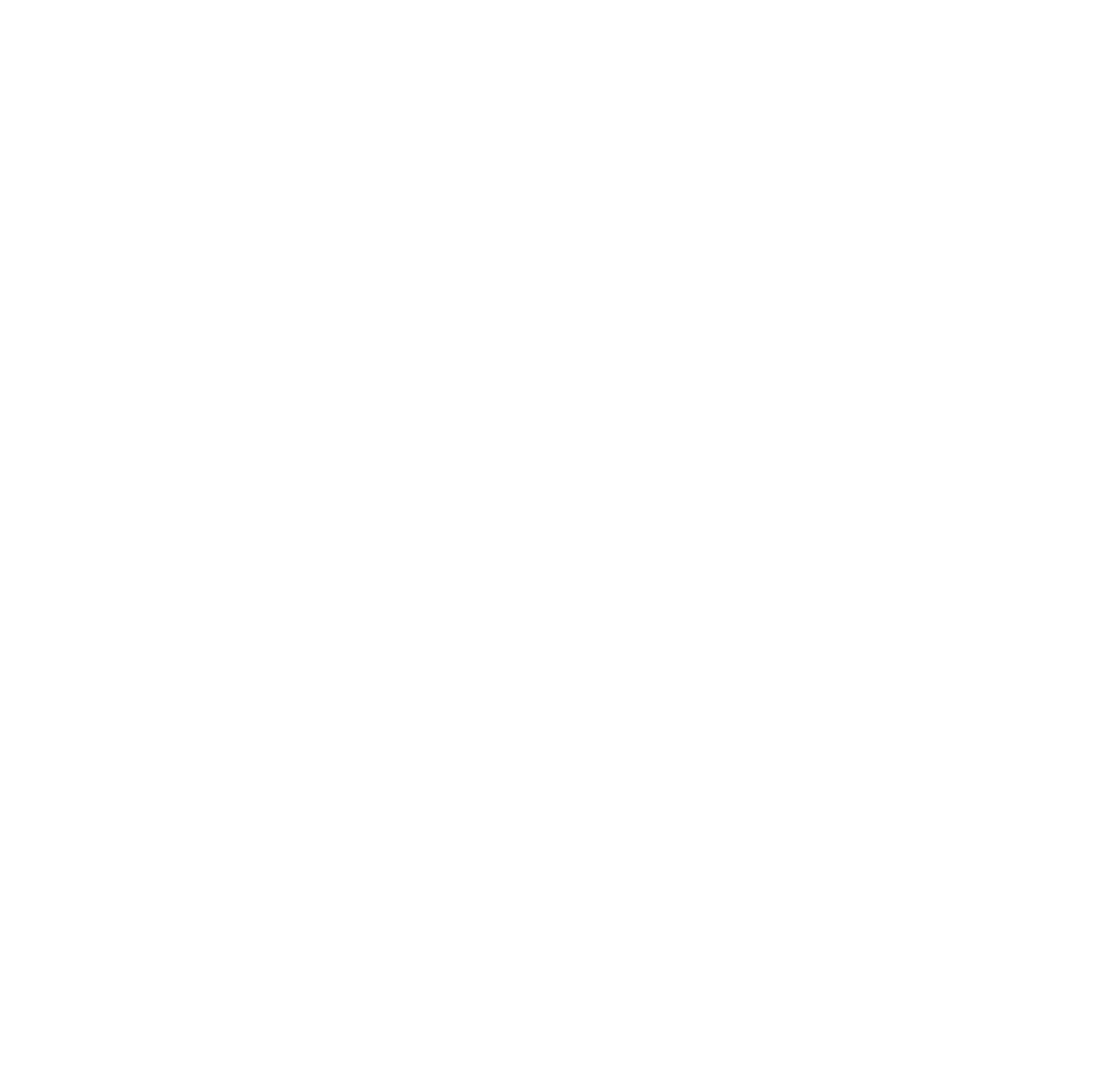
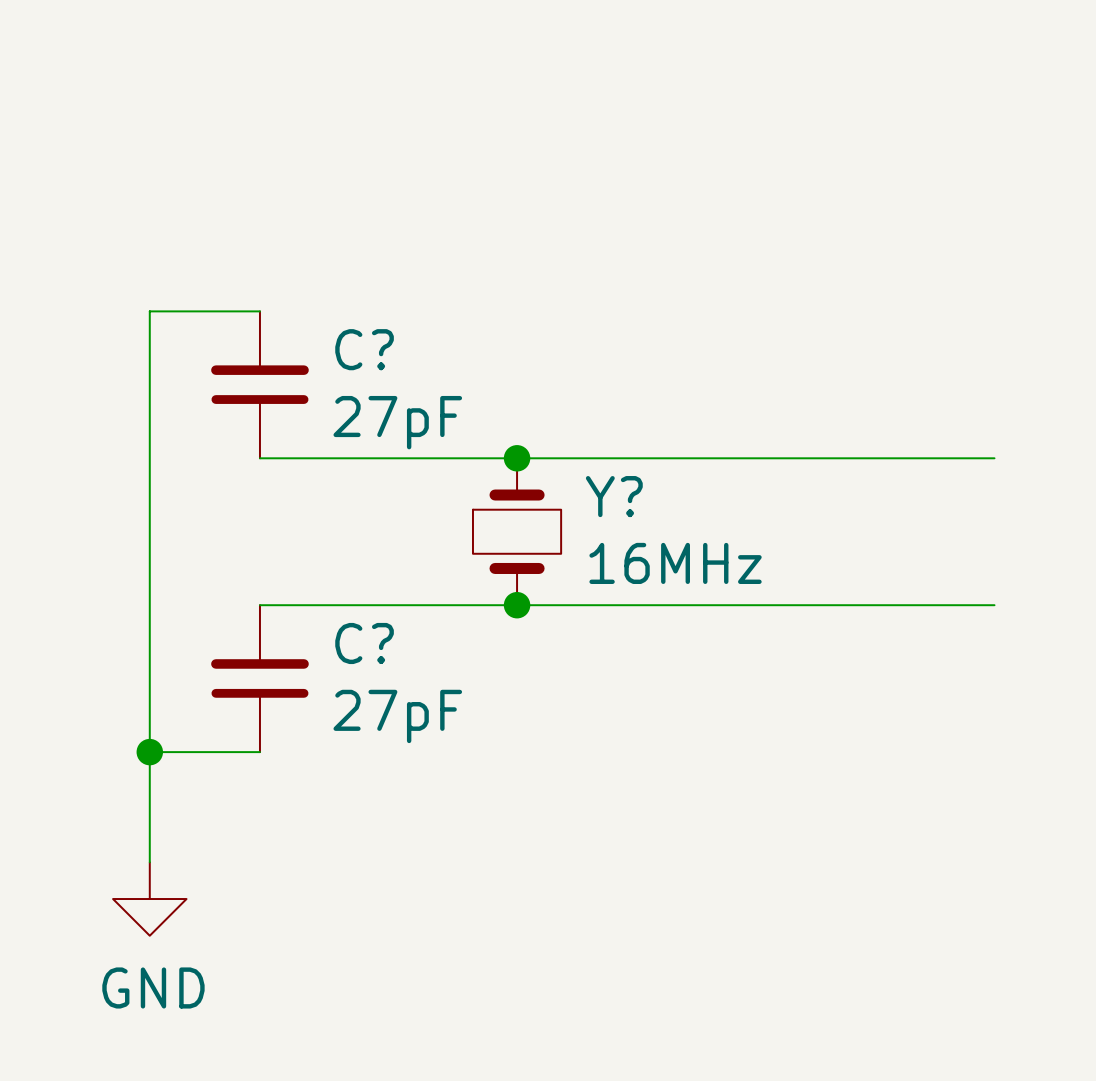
wire: none -> (259, 311) (149, 311) (149, 862)
C?: none -> 27pF (259, 384)
wire: none -> (259, 458) (994, 458)
junction: none -> (517, 458)
Y?: none -> 16MHz (517, 531)
wire: none -> (259, 605) (994, 605)
junction: none -> (517, 605)
C?: none -> 27pF (259, 678)
wire: none -> (149, 752) (259, 752)
junction: none -> (149, 752)
power symbol: none -> GND (149, 899)

